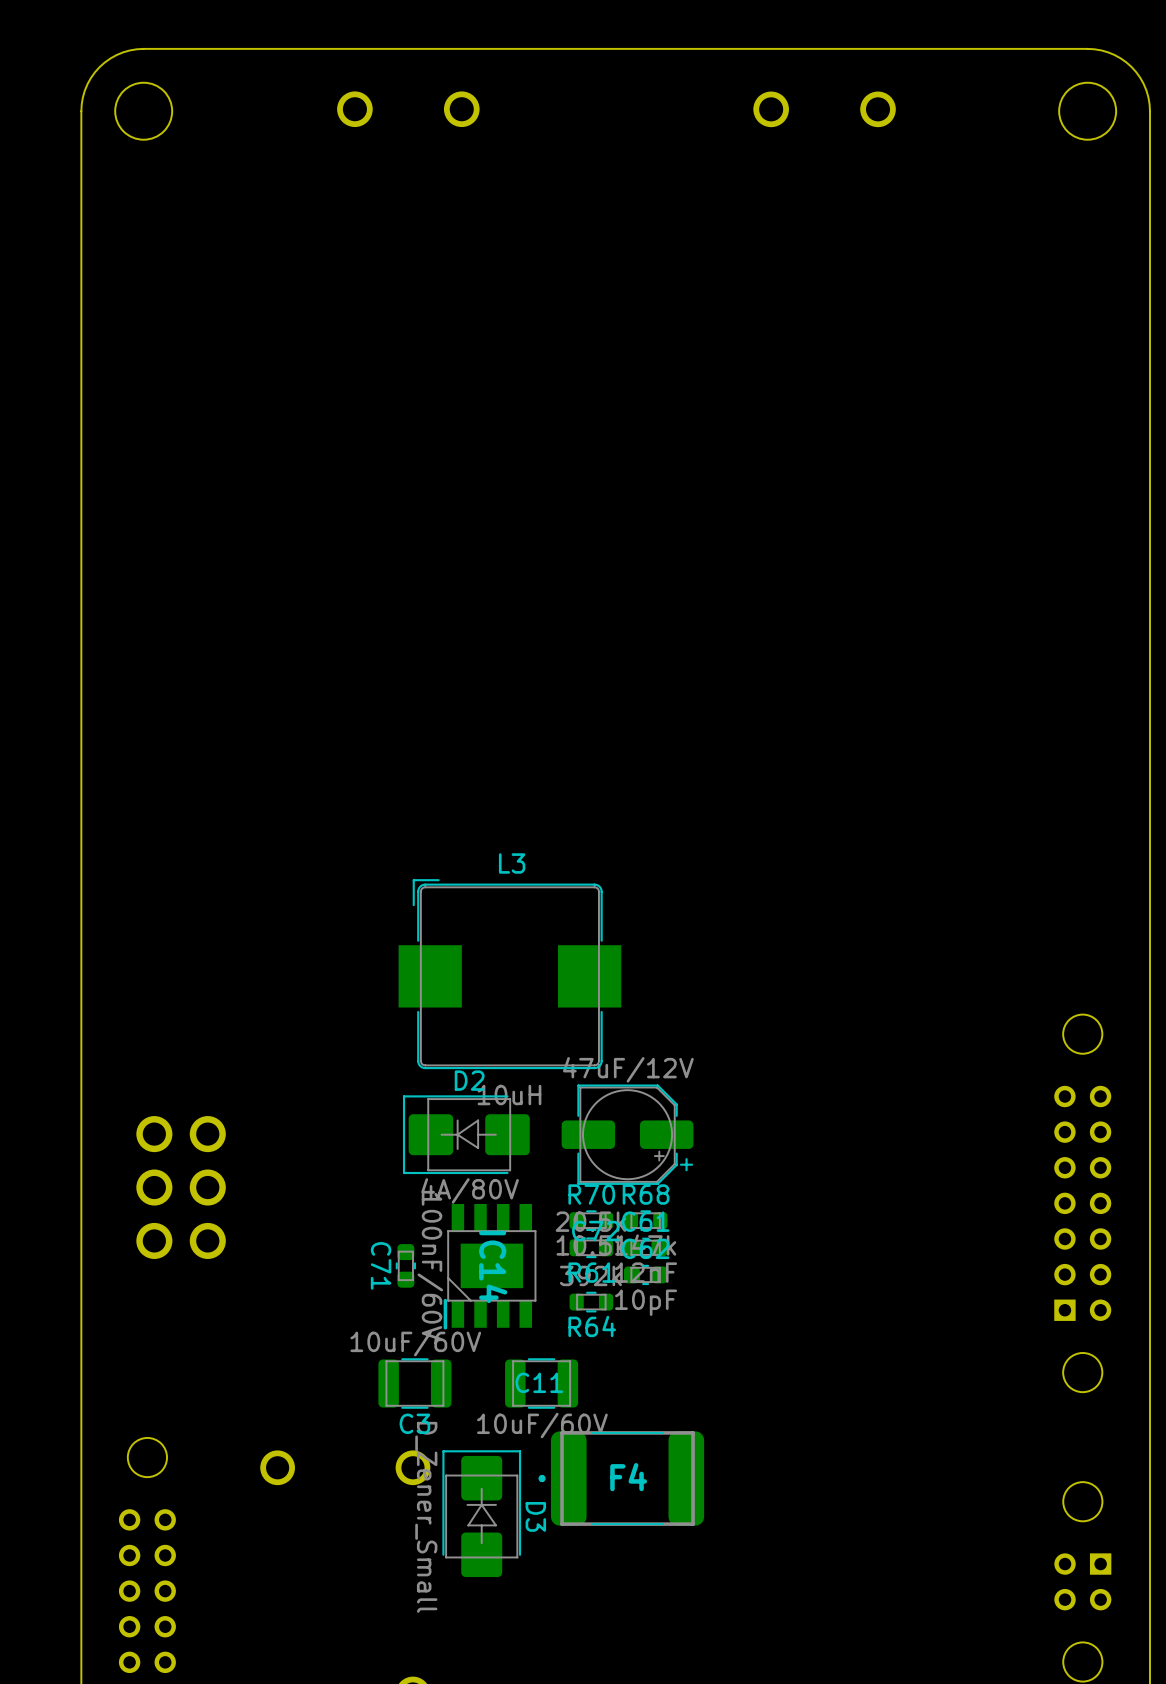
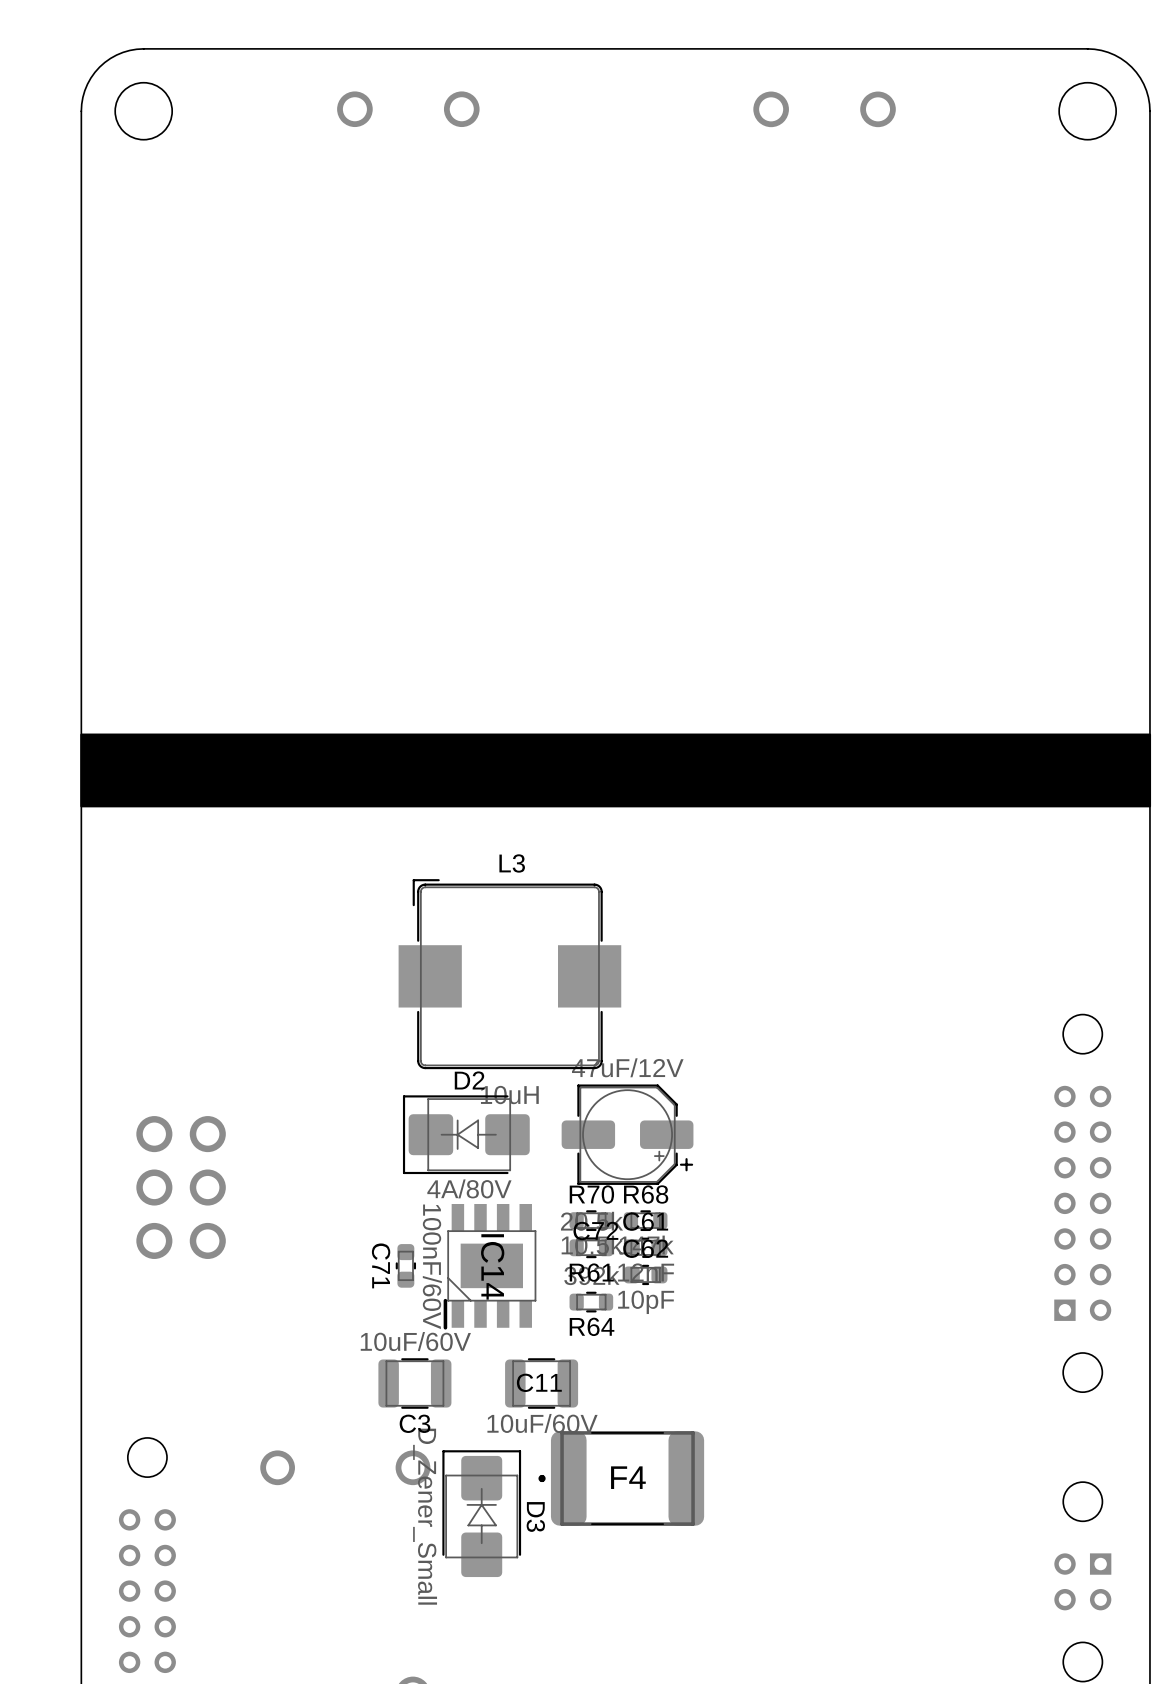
drawing: none -> [80, 733, 1152, 808]

